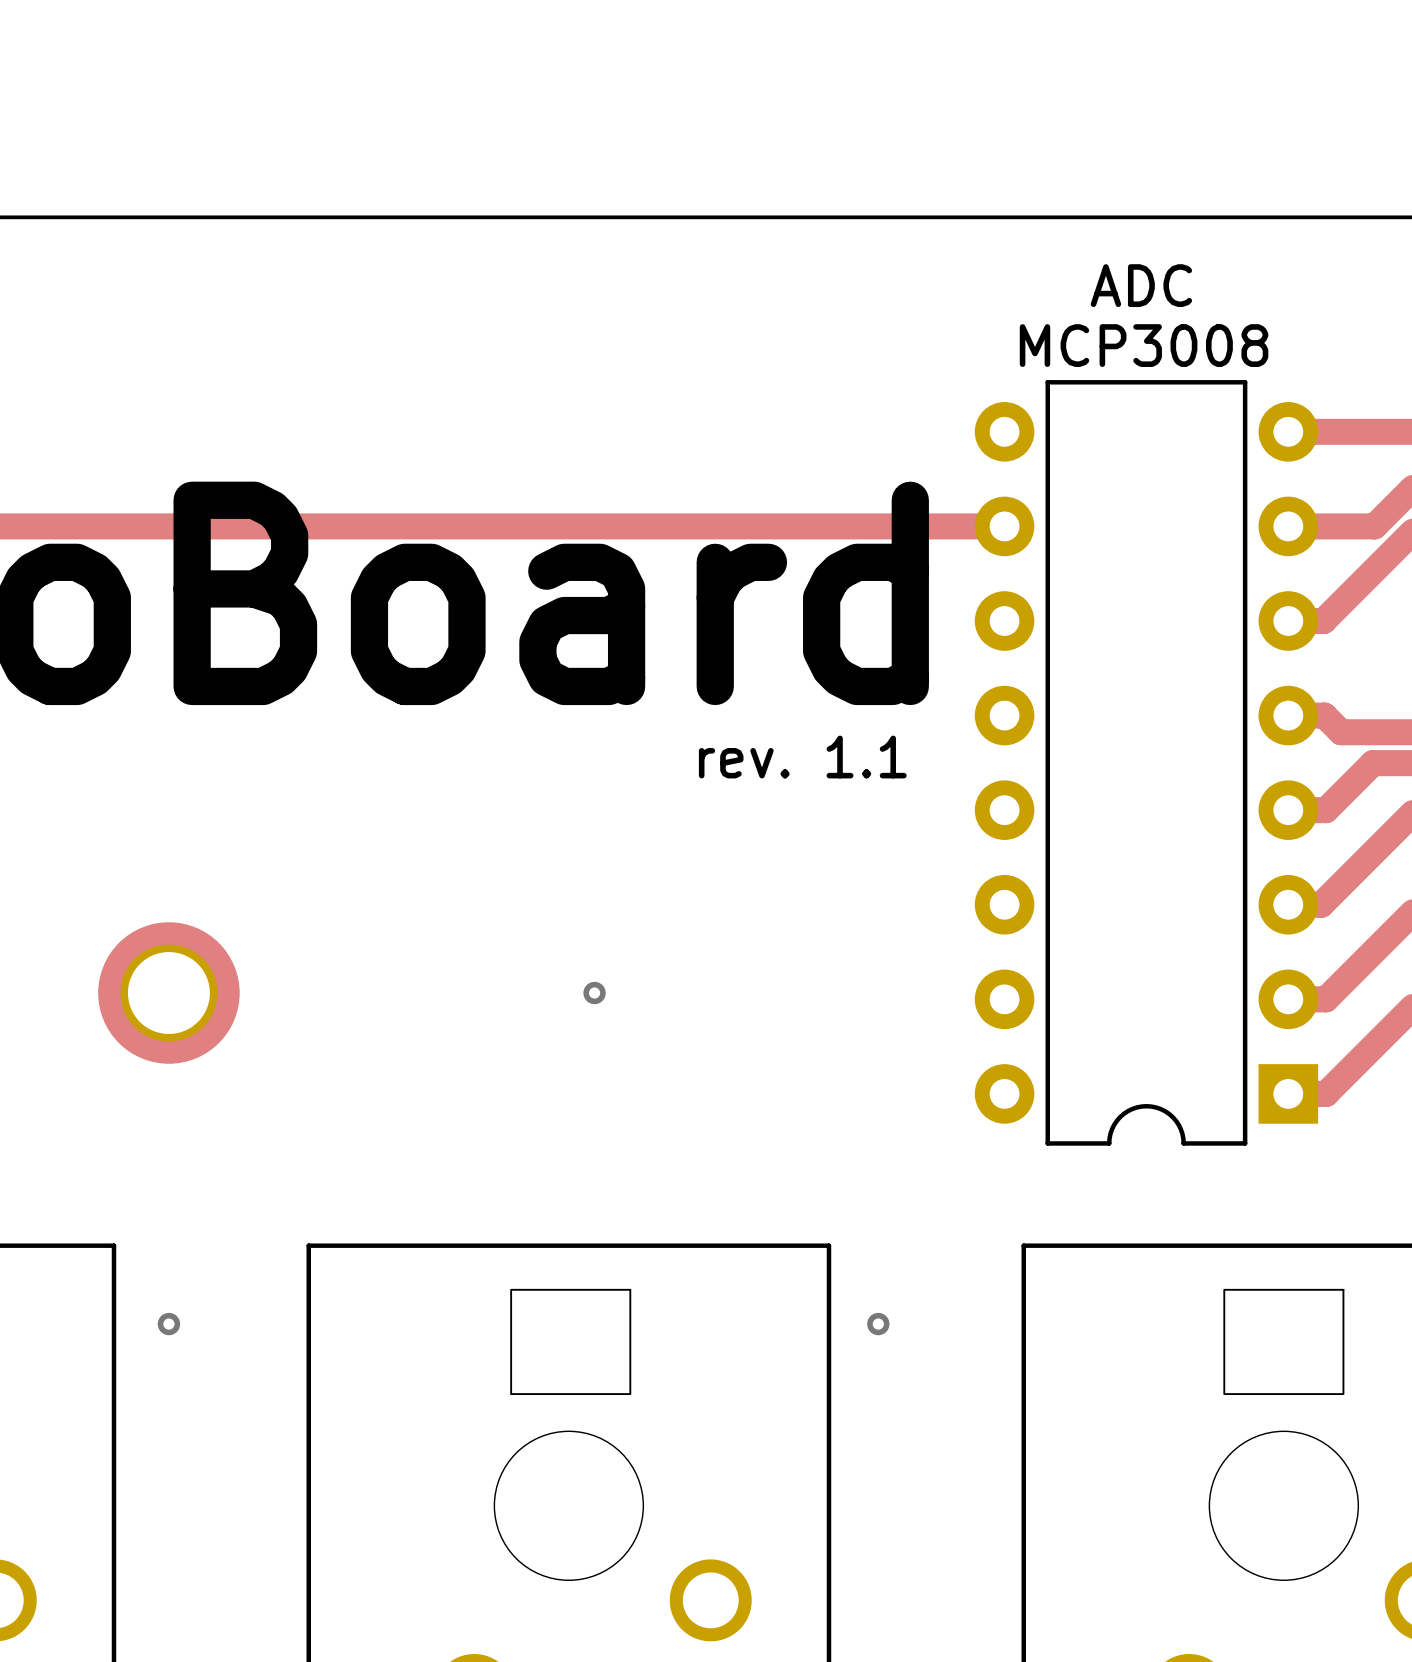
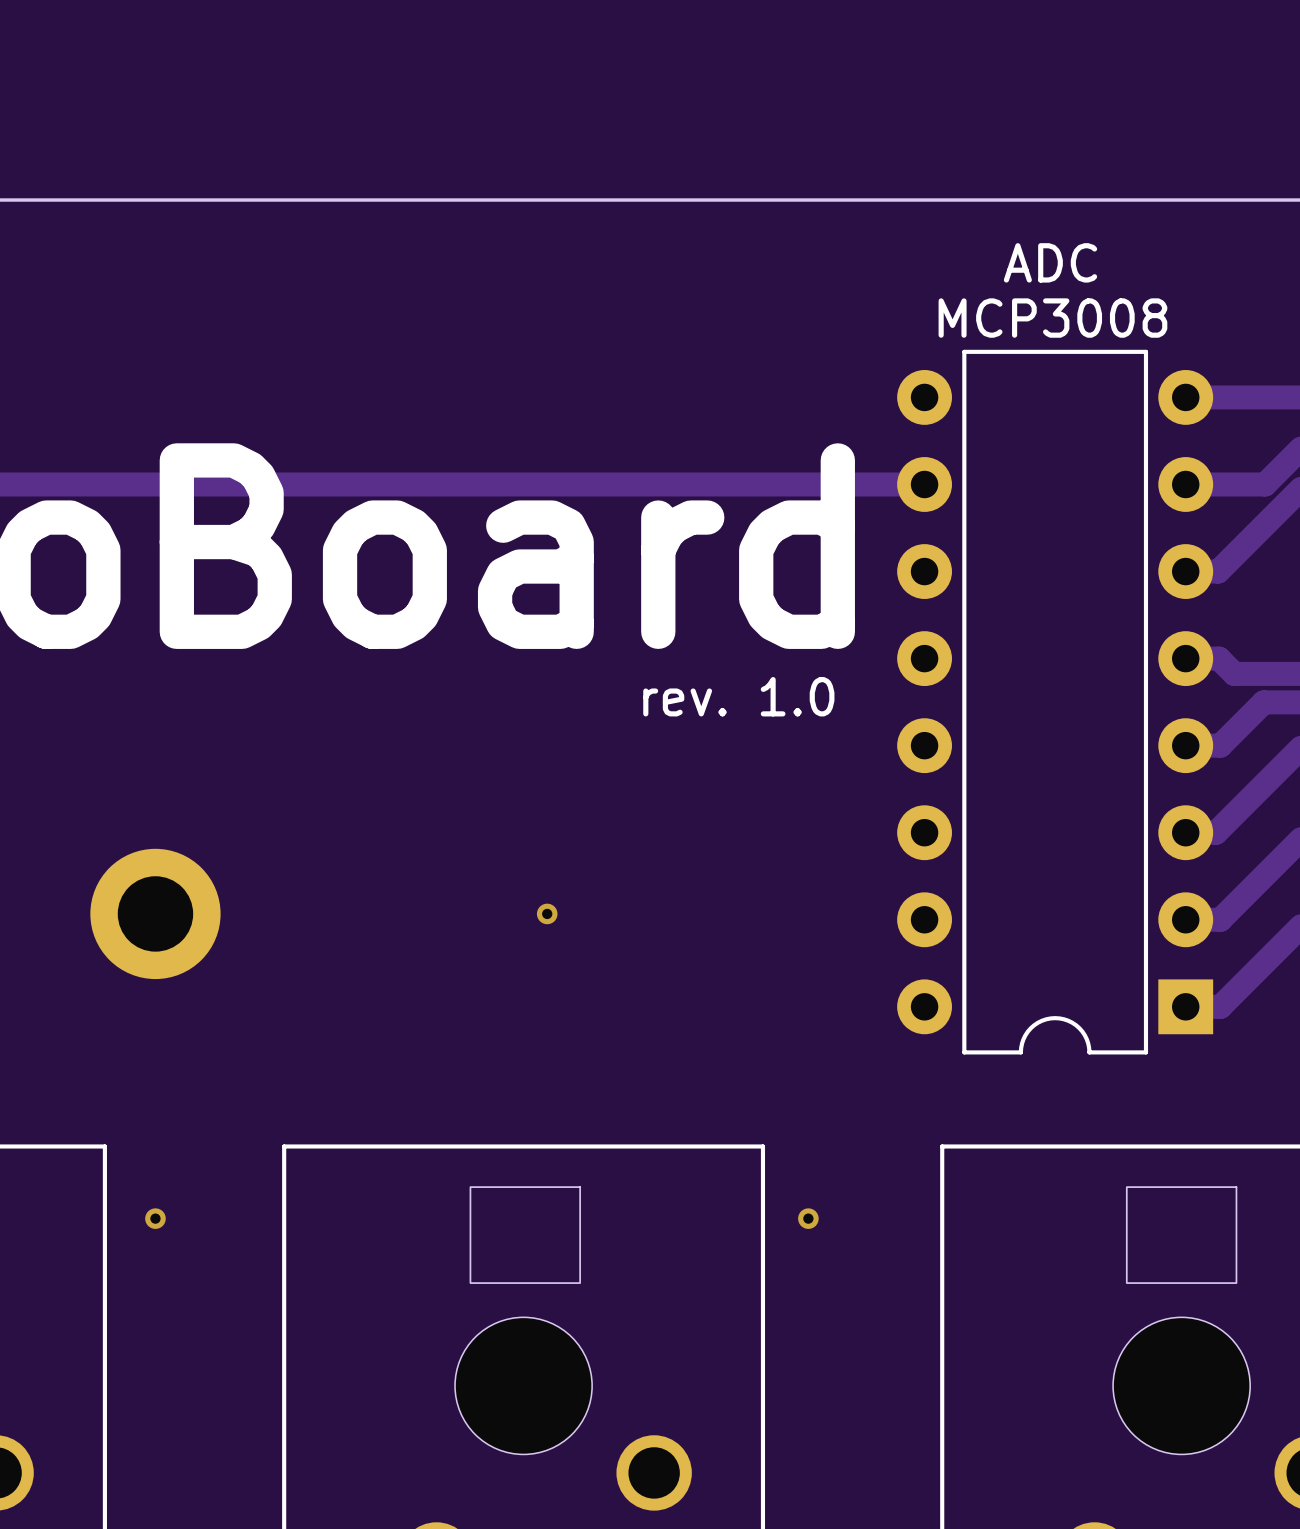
text: rev. 1.1 (802, 757) -> rev. 1.0 (738, 696)

